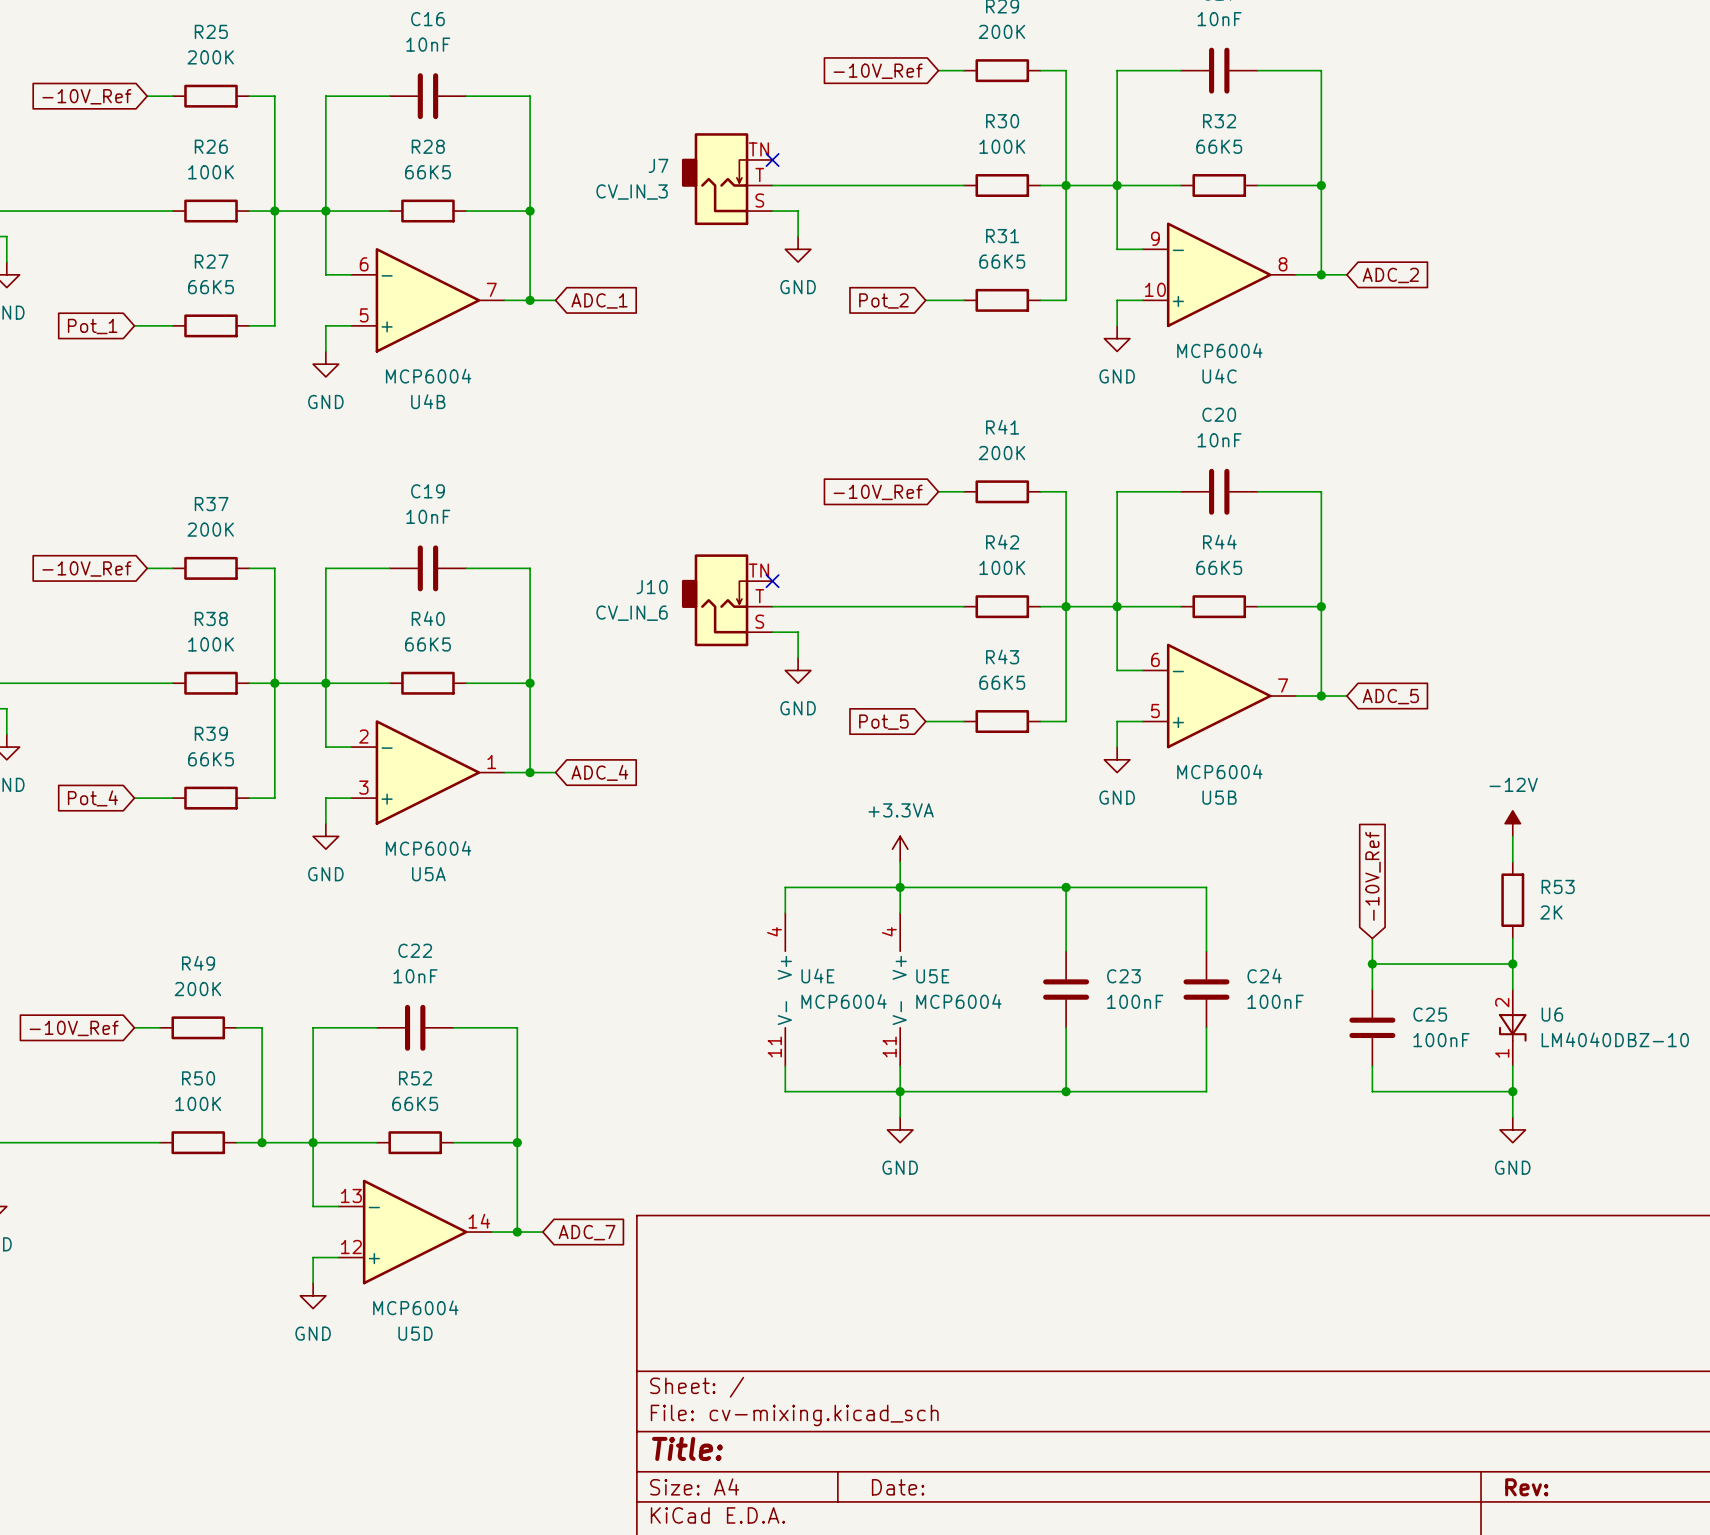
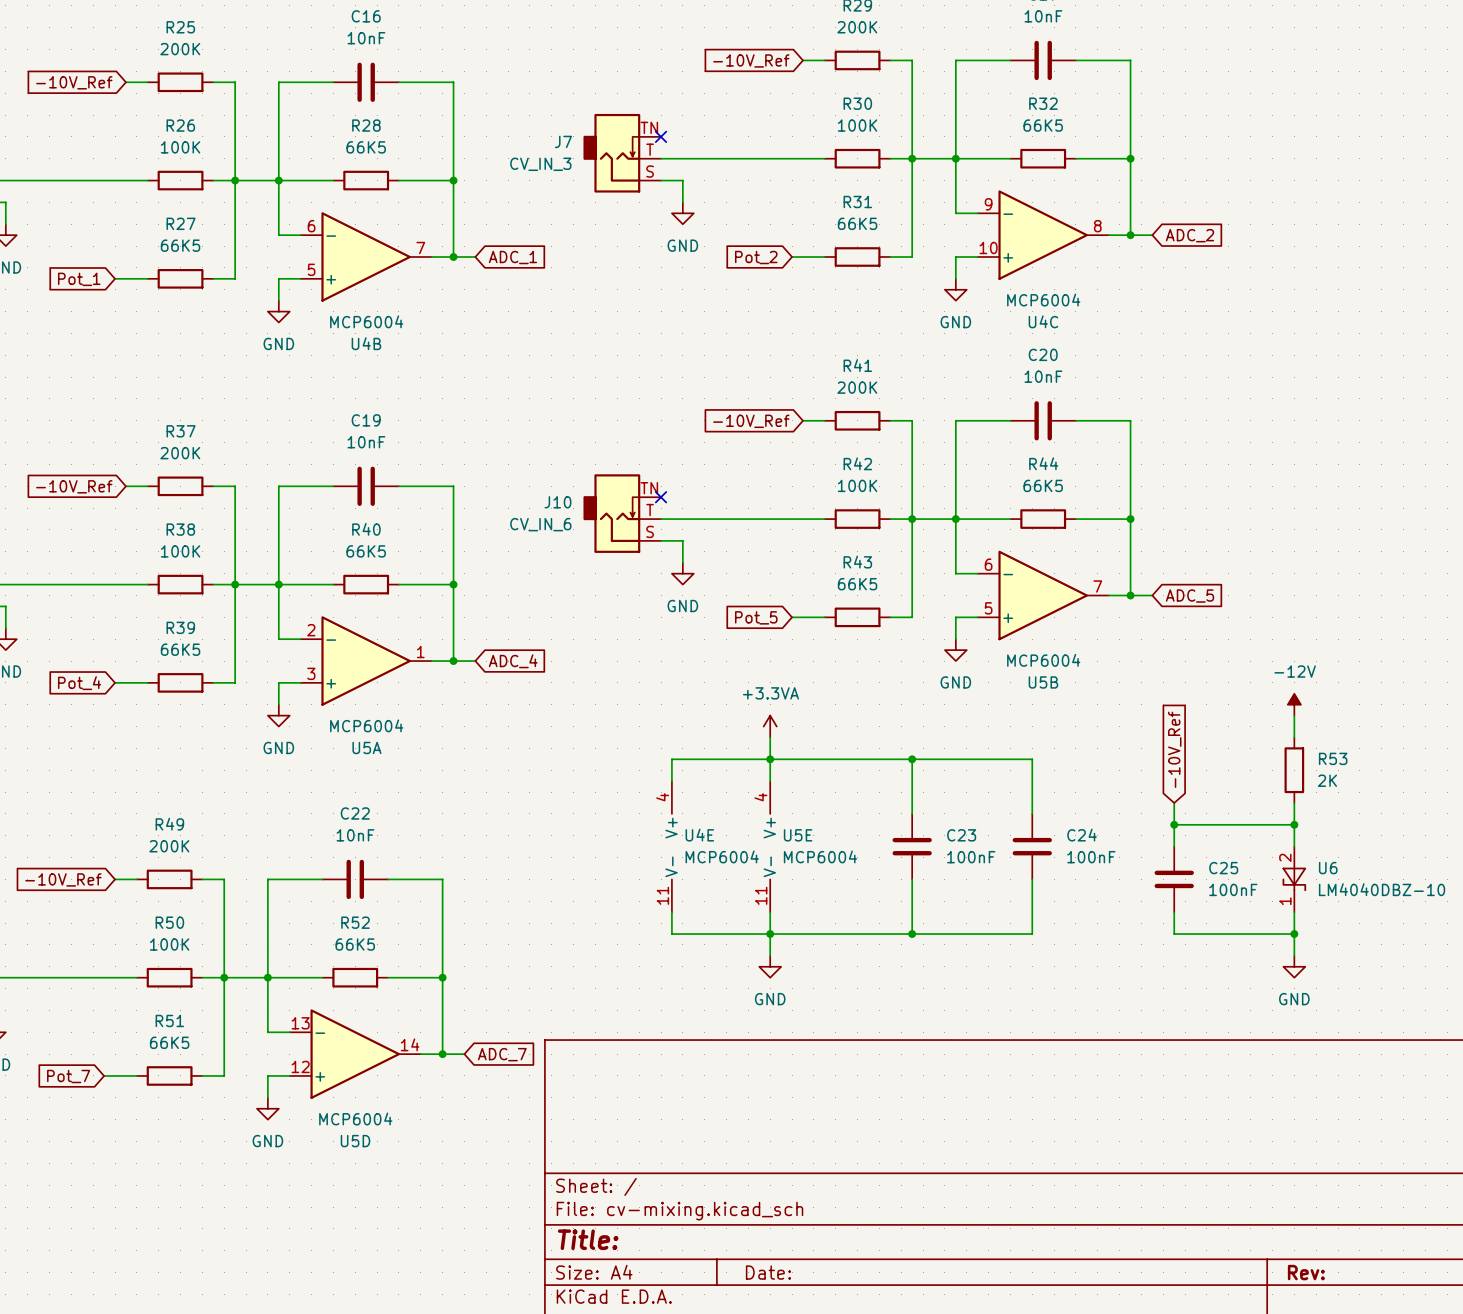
wire: none -> (224, 977) (224, 1075) (202, 1075)
wire: none -> (104, 1075) (136, 1075)
R51: none -> 66K5 (169, 1075)
global label: none -> Pot_7 (68, 1076)

